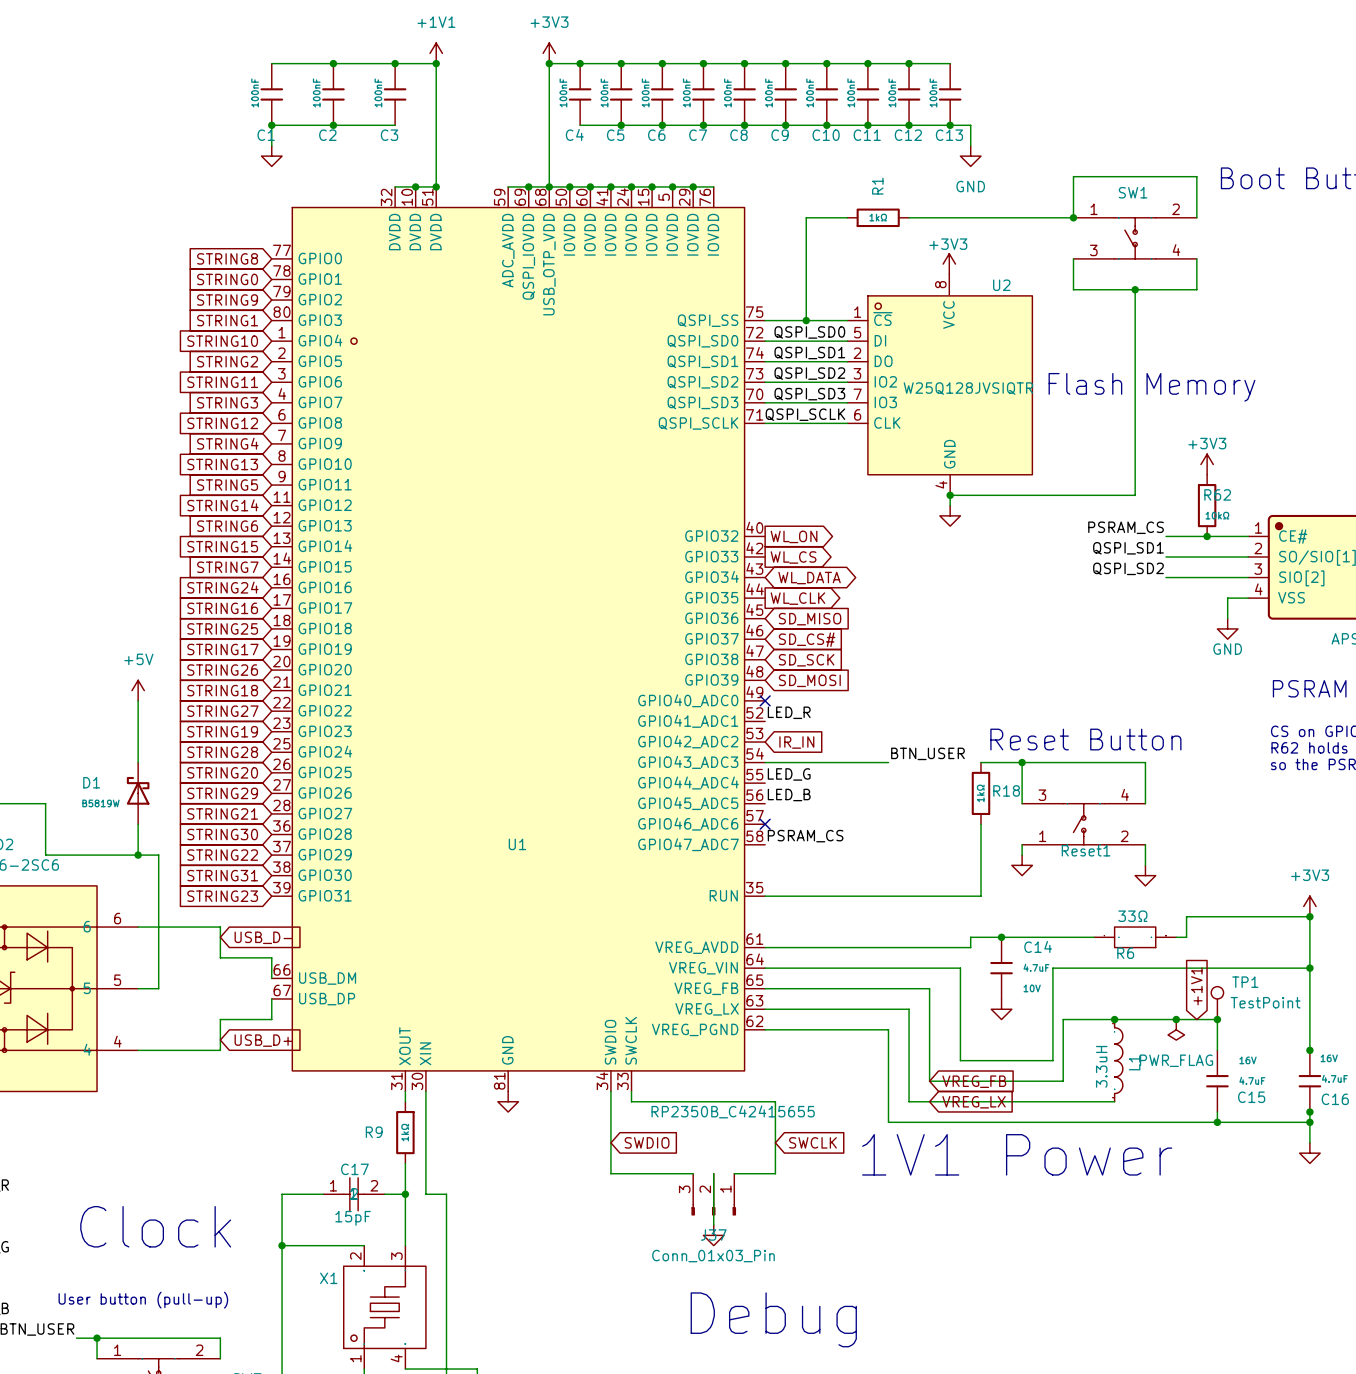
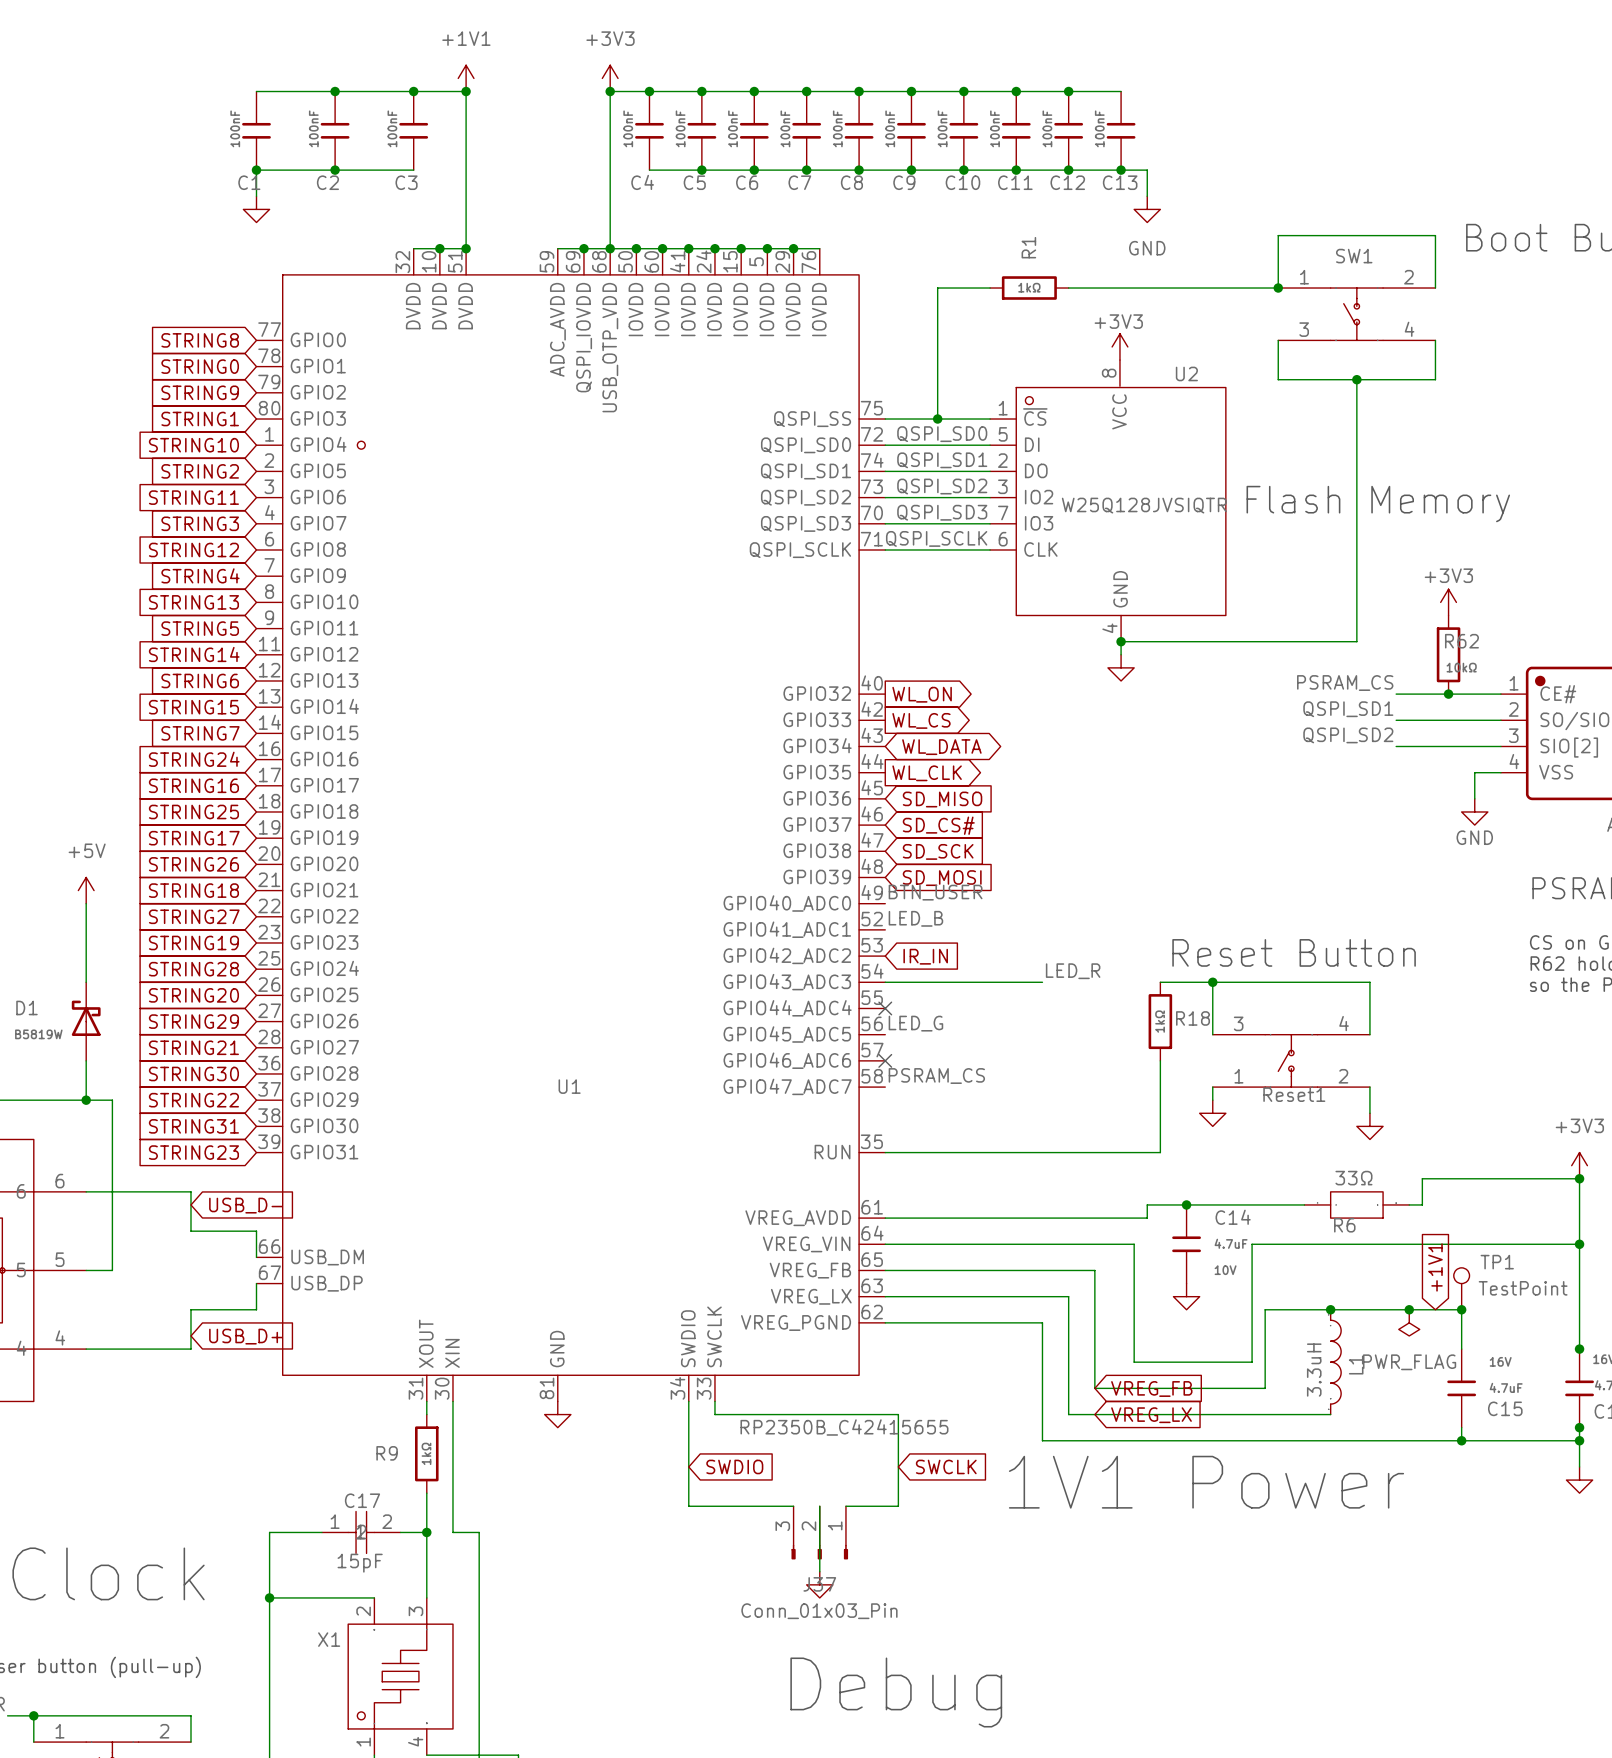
label: none -> BTN_USER (935, 892)
no-connect mark: (765, 700) -> none
label: LED_R (789, 712) -> LED_B (915, 918)
label: BTN_USER (927, 753) -> LED_R (1073, 971)
label: LED_G (789, 774) -> none
no-connect mark: none -> (885, 1008)
label: LED_B (789, 795) -> LED_G (915, 1023)

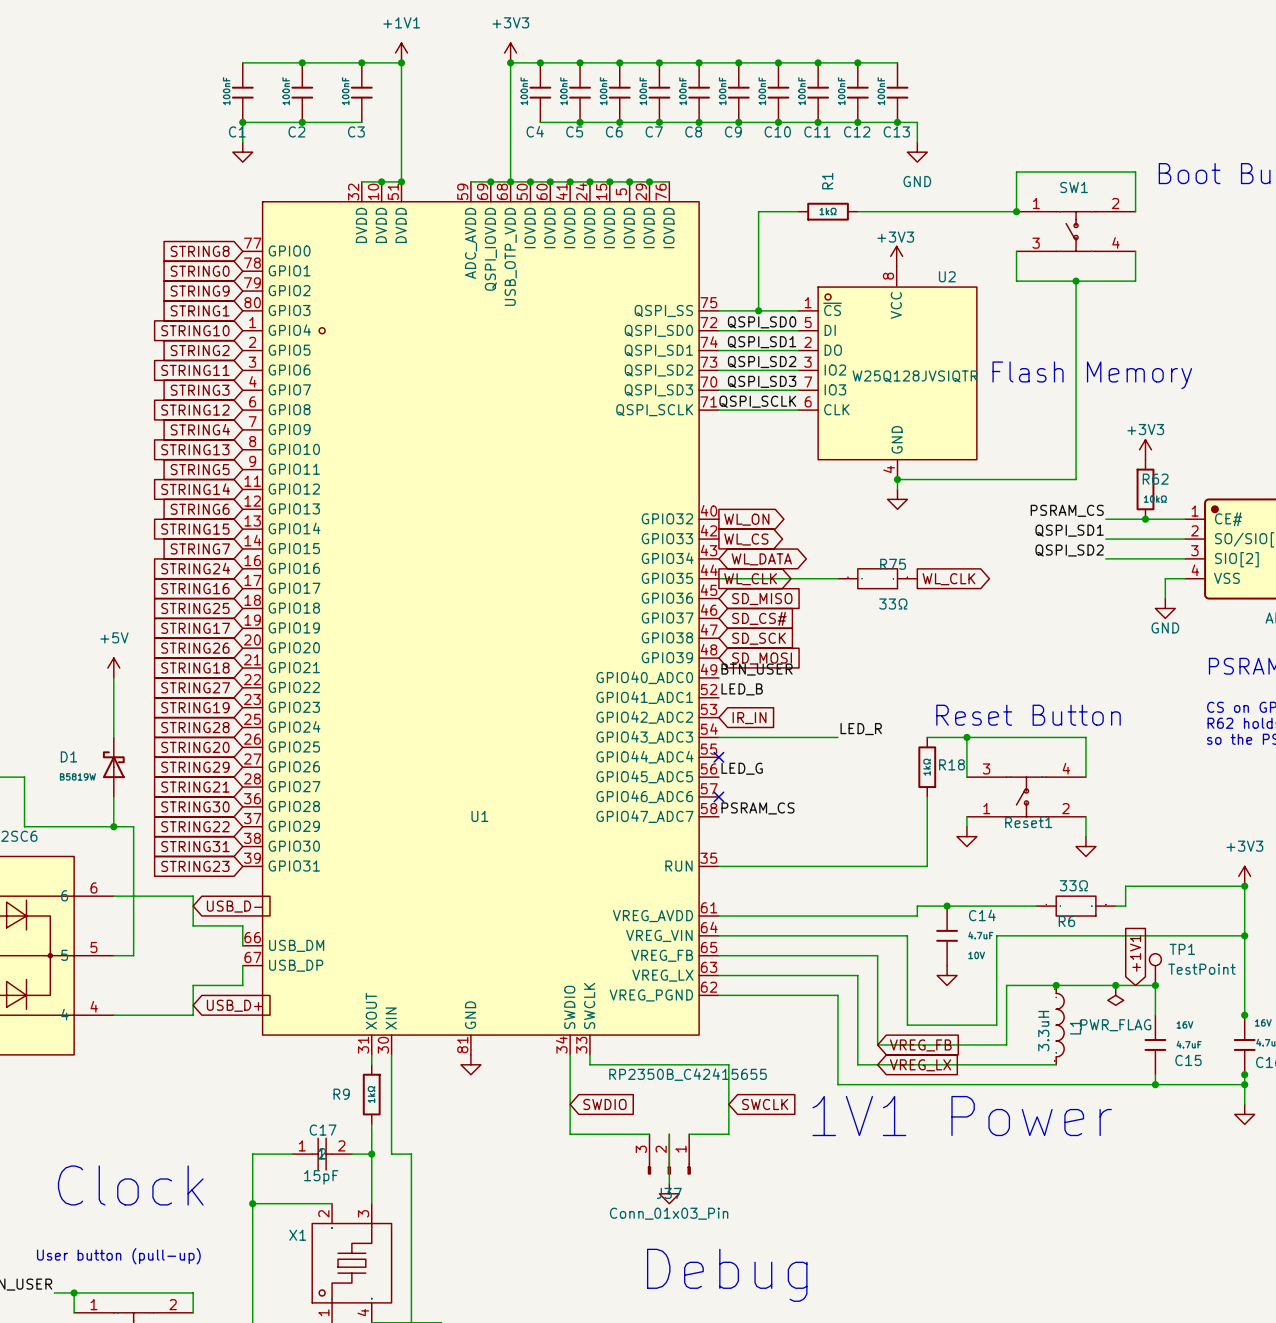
wire: none -> (718, 578) (837, 578)
R75: none -> 33Ω (877, 578)
global label: none -> WL_CLK (949, 579)

